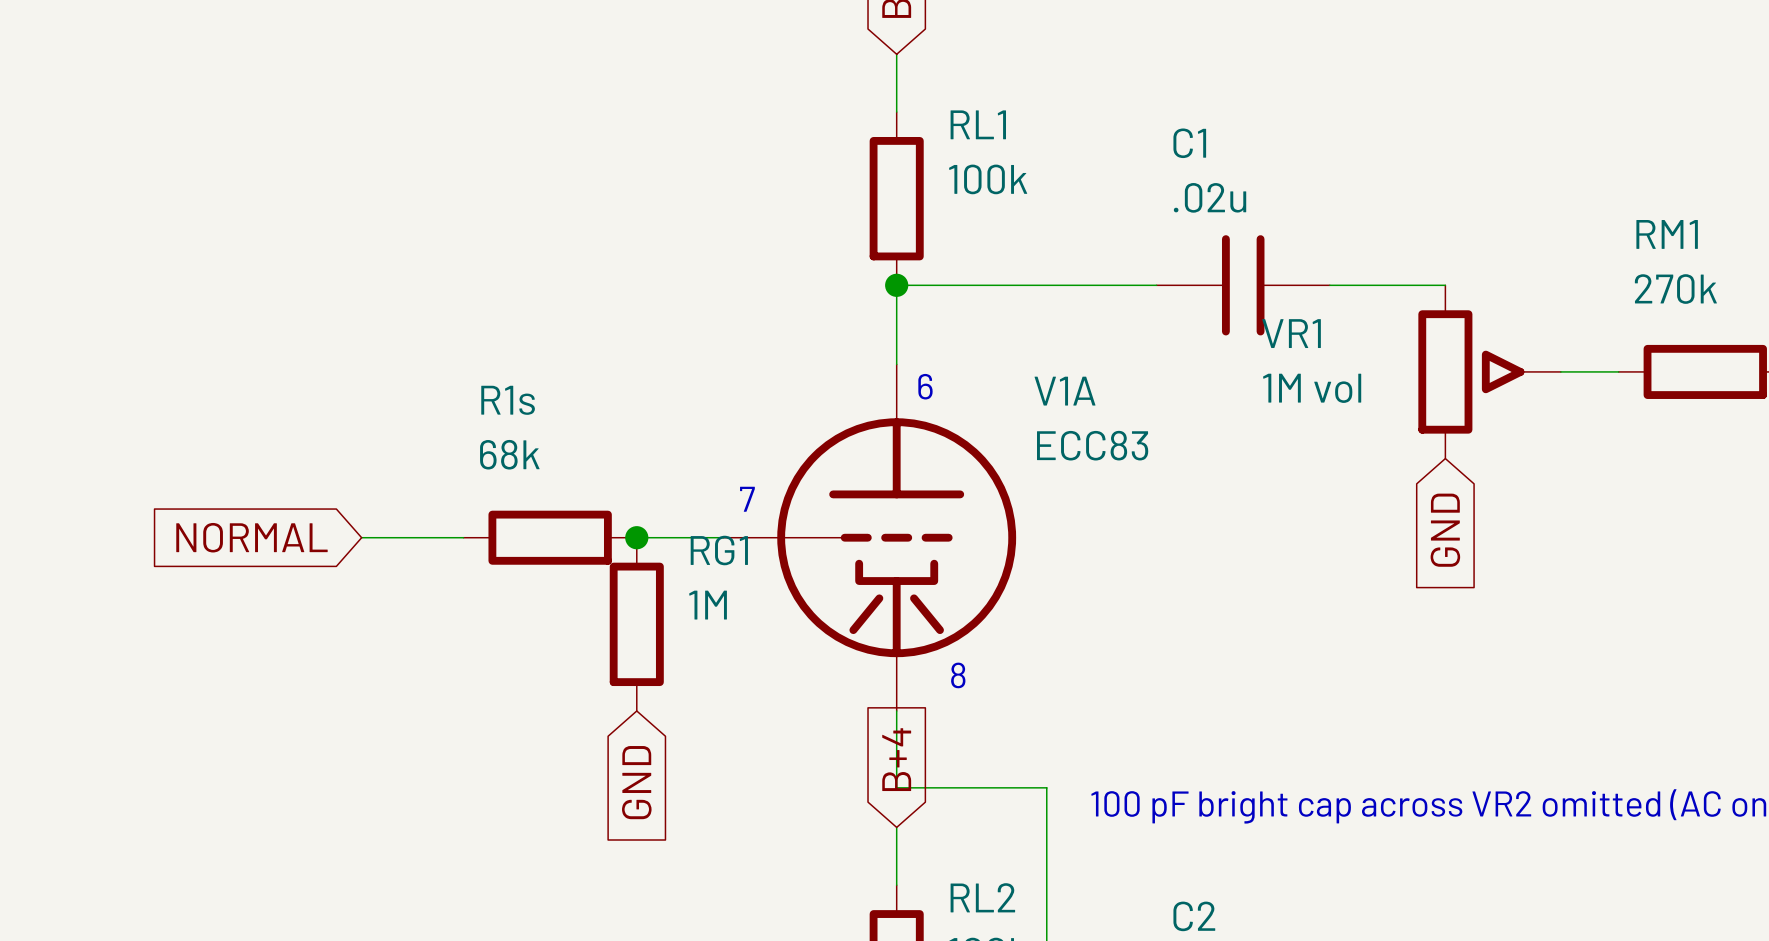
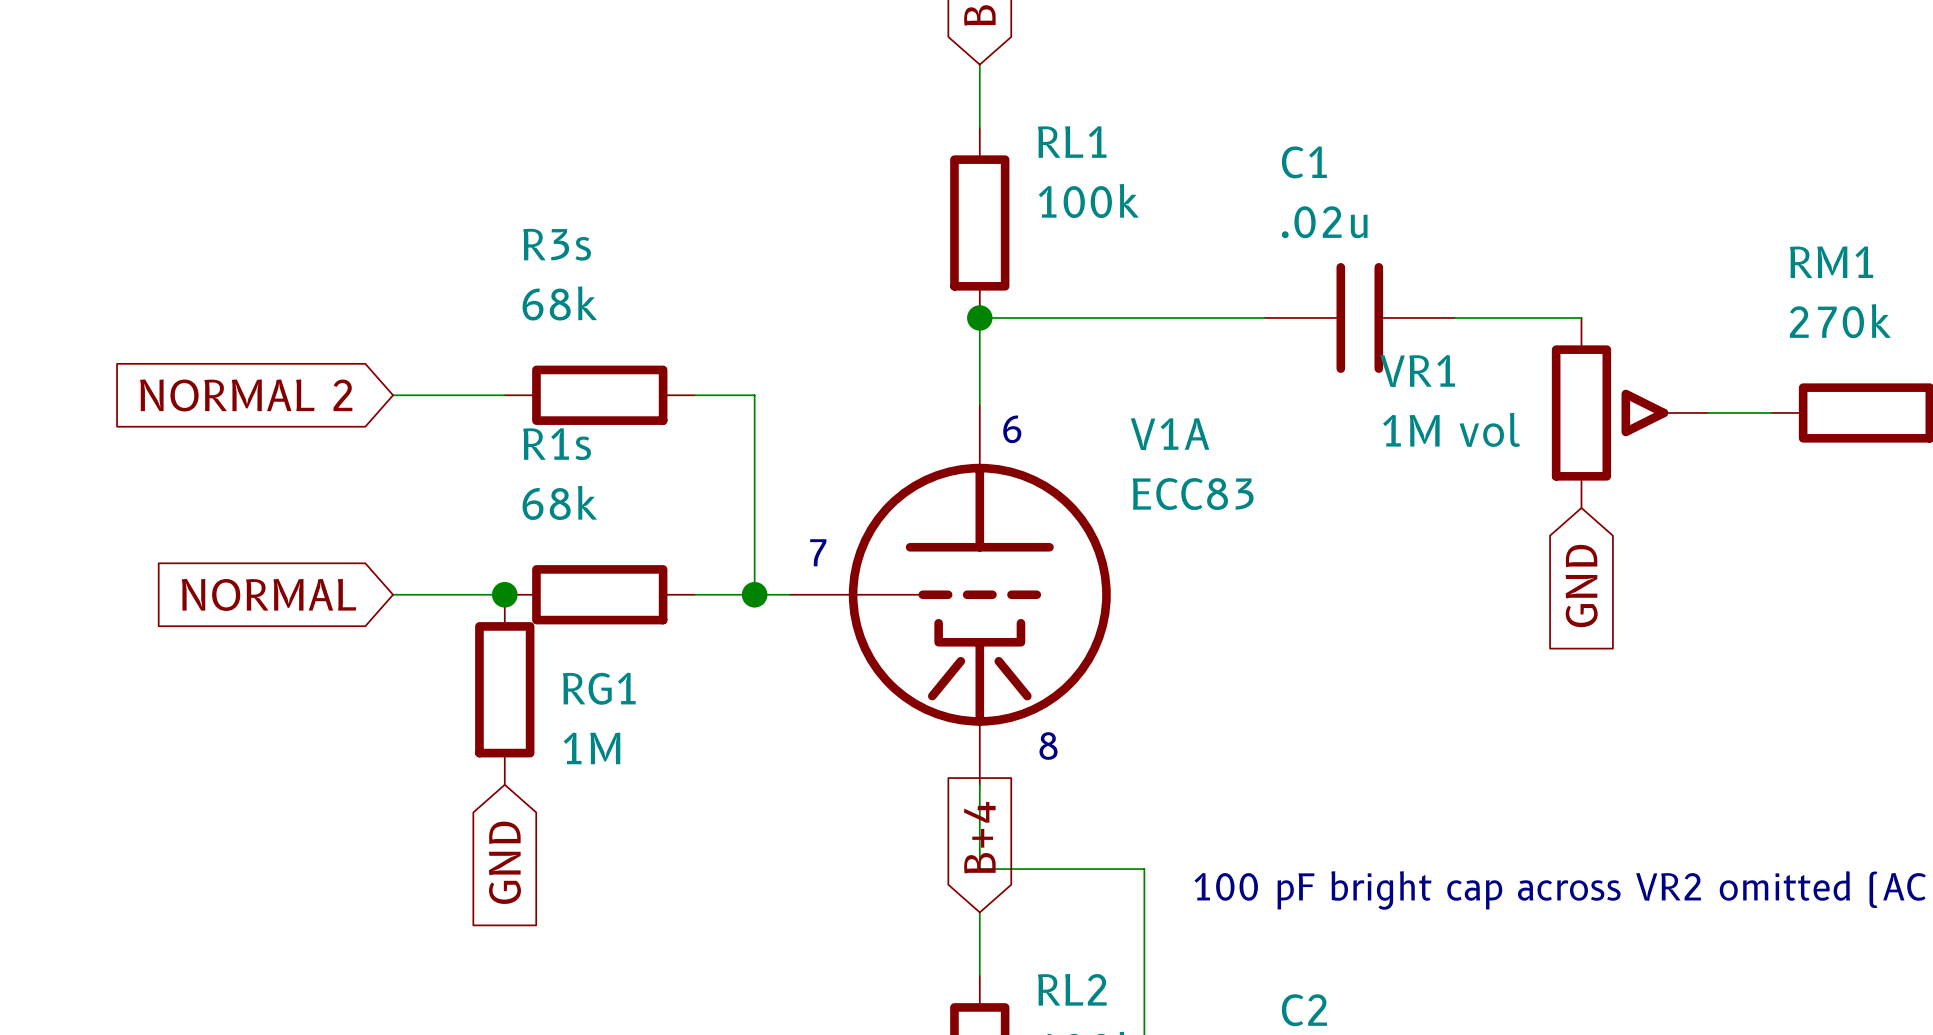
global label: none -> NORMAL 2 (246, 395)
wire: none -> (393, 395) (504, 395)
R3s: none -> 68k (599, 395)
wire: none -> (694, 395) (754, 395) (754, 594)
junction: none -> (504, 594)
RG1 symbol: [609, 537, 664, 711] -> [475, 594, 535, 785]
junction position: (636, 537) -> (754, 594)
RG1 name position: RG1 (719, 550) -> RG1 (599, 688)
RG1 value position: 1M (708, 605) -> 1M (592, 748)
global label position: GND (636, 782) -> GND (504, 862)

